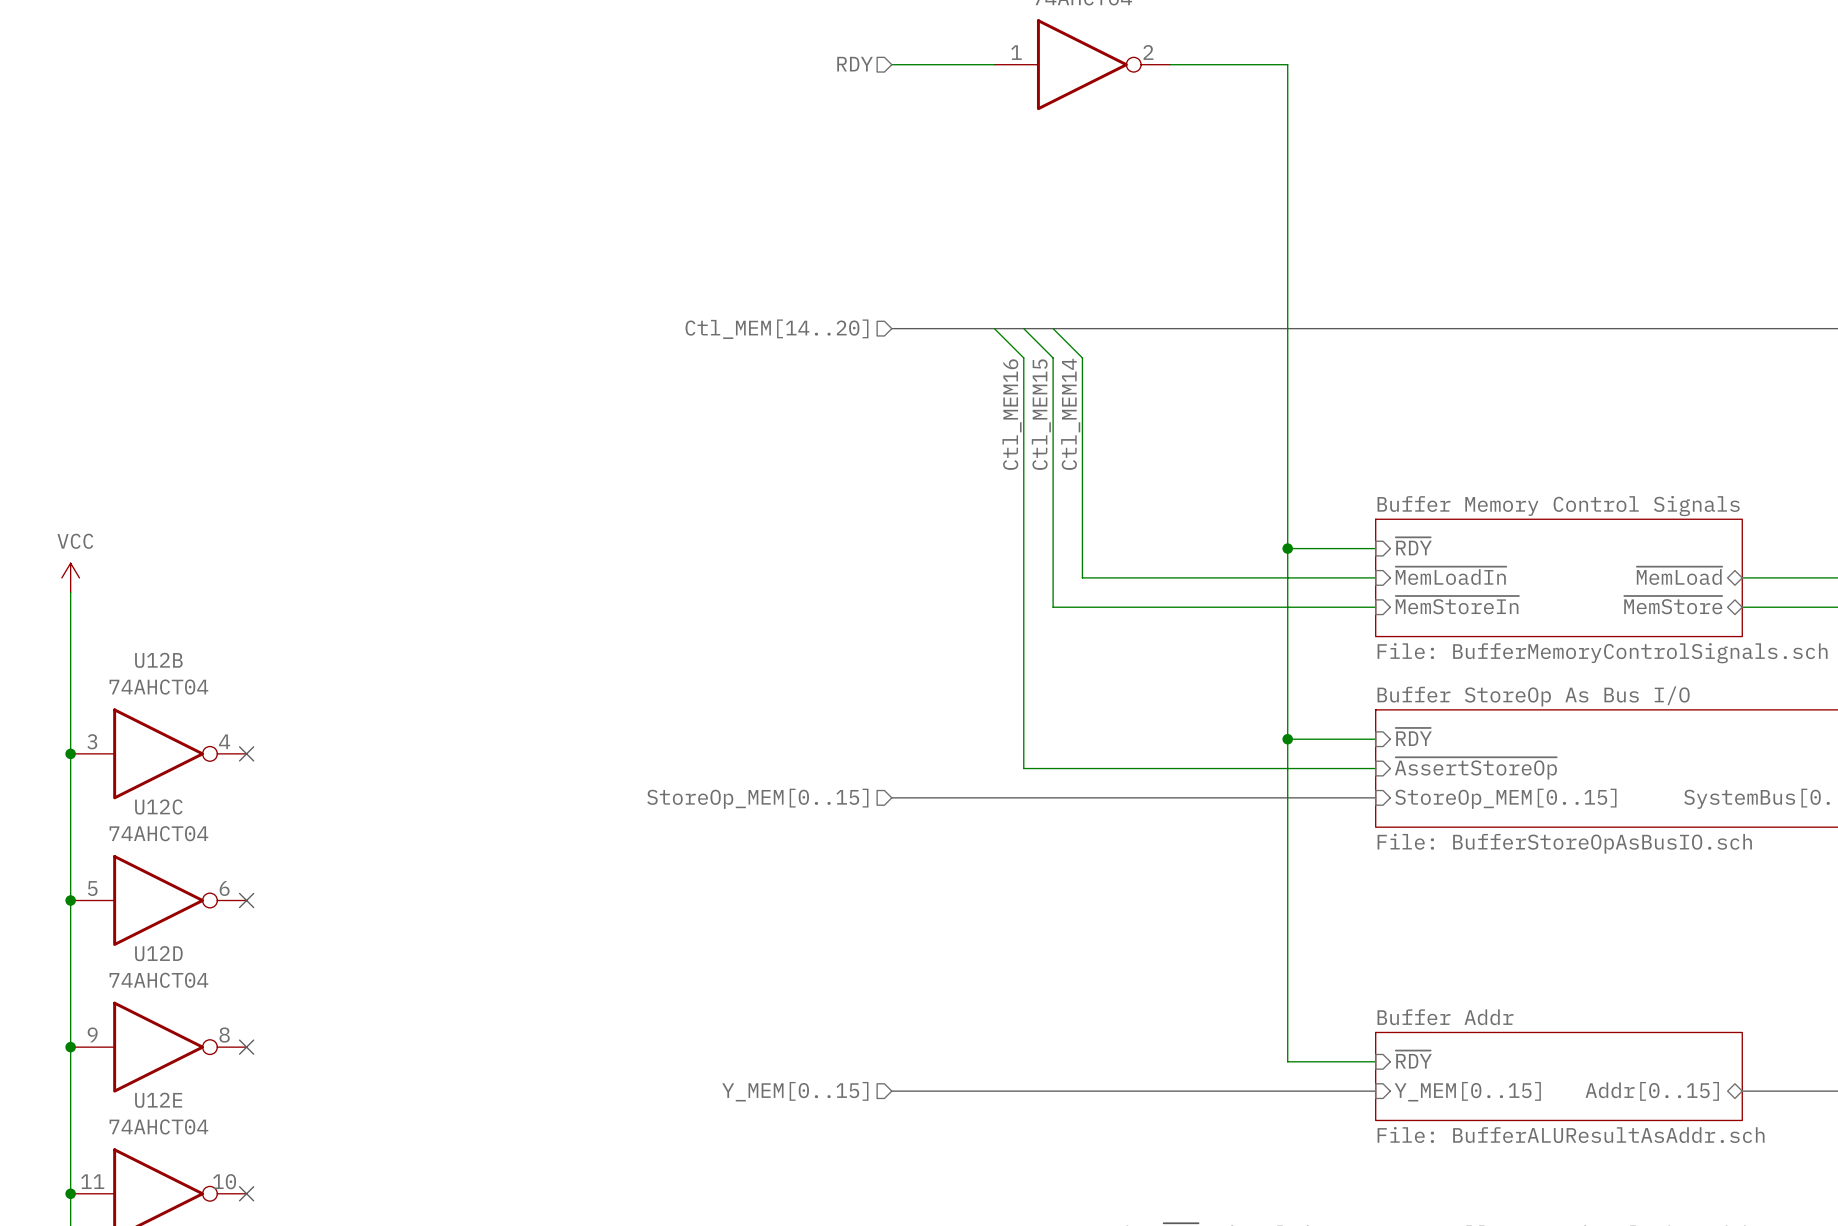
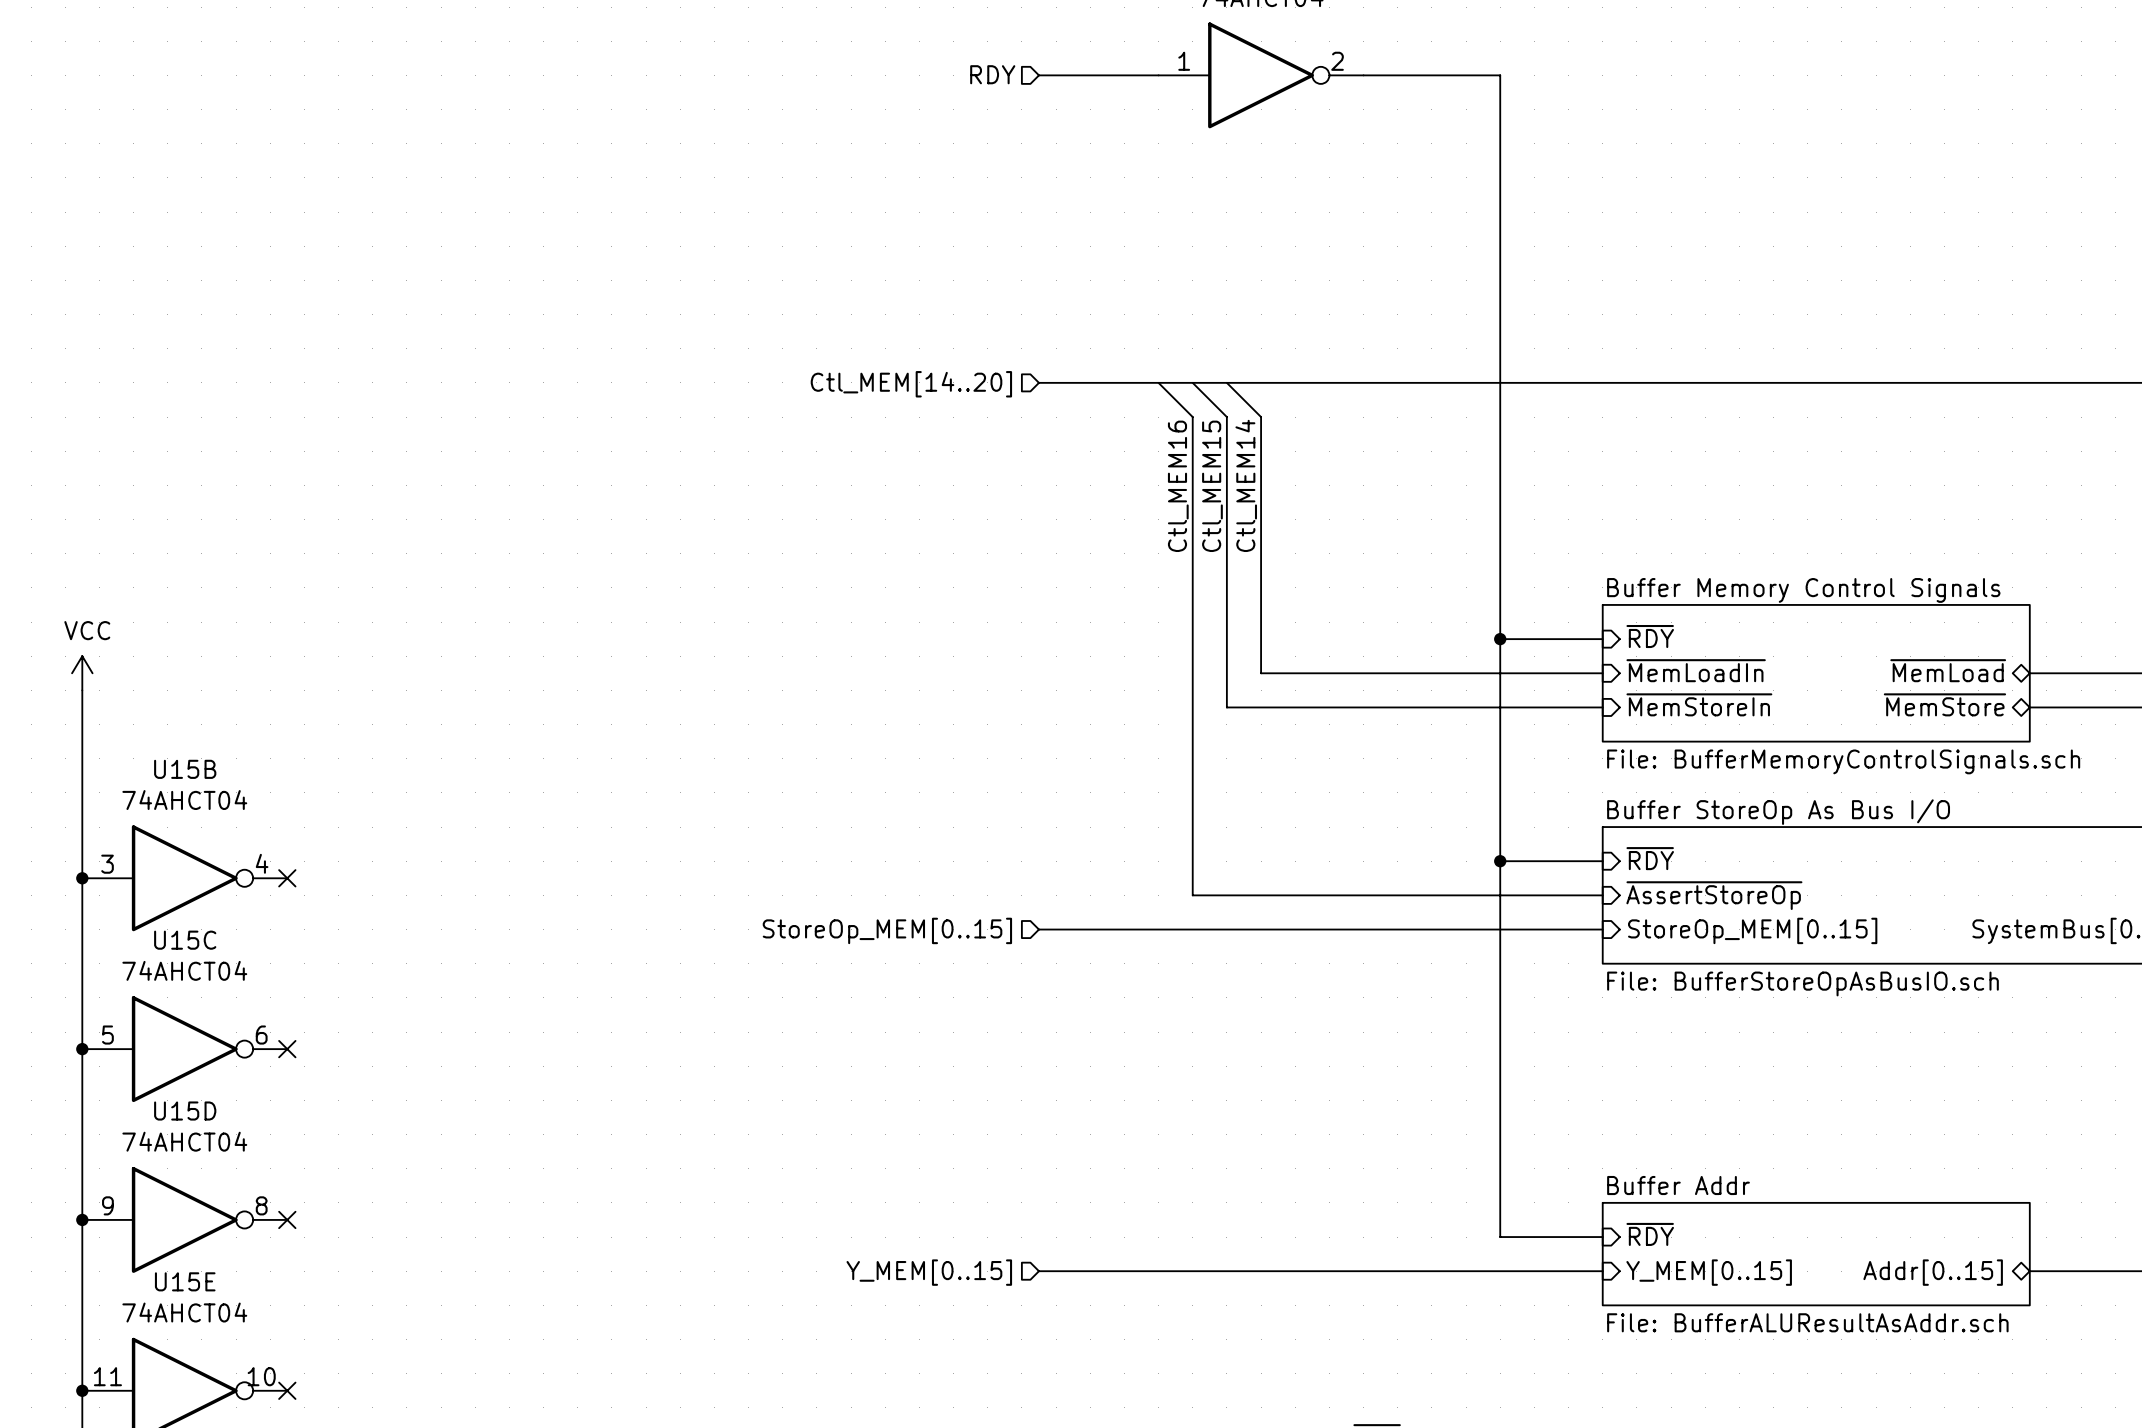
U12B name: U12B (158, 660) -> U15B (185, 769)
U12C name: U12C (158, 806) -> U15C (185, 940)
U12D name: U12D (158, 953) -> U15D (185, 1111)
U12E name: U12E (158, 1100) -> U15E (185, 1281)

